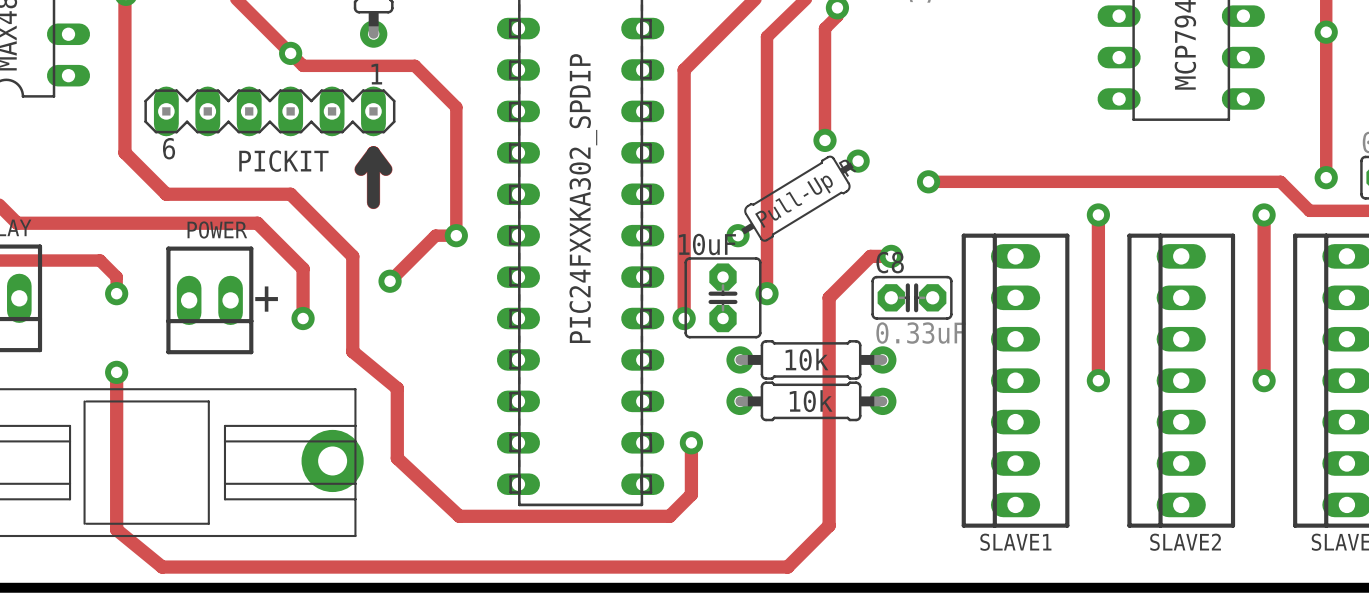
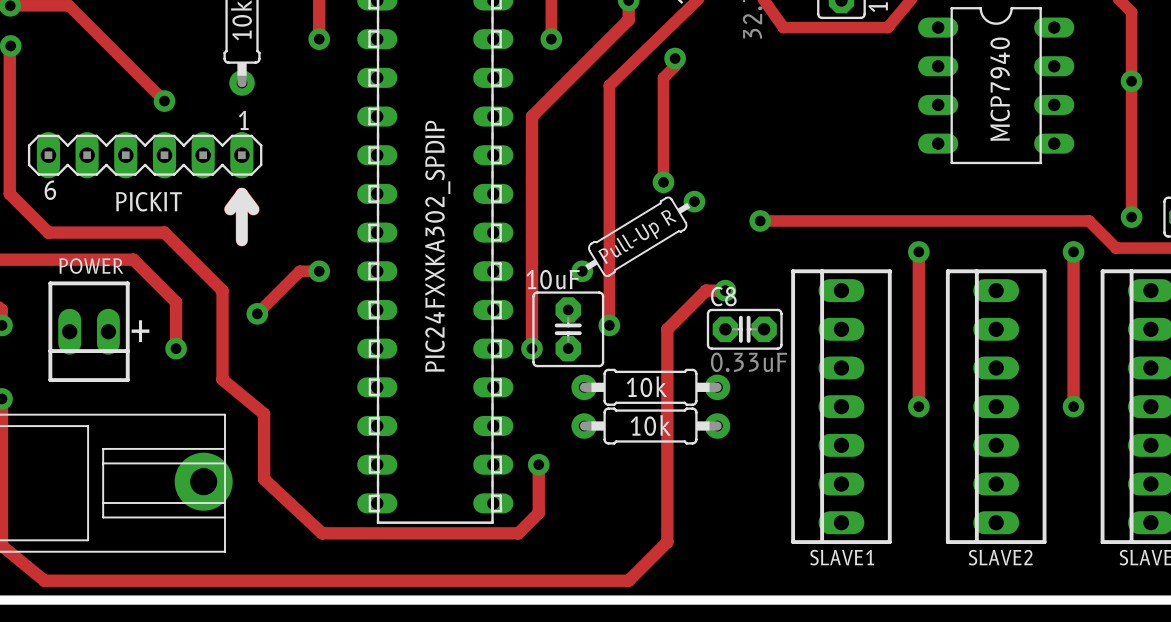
track: (290, 53) (303, 65) (414, 65) (456, 107) (456, 235) -> none

